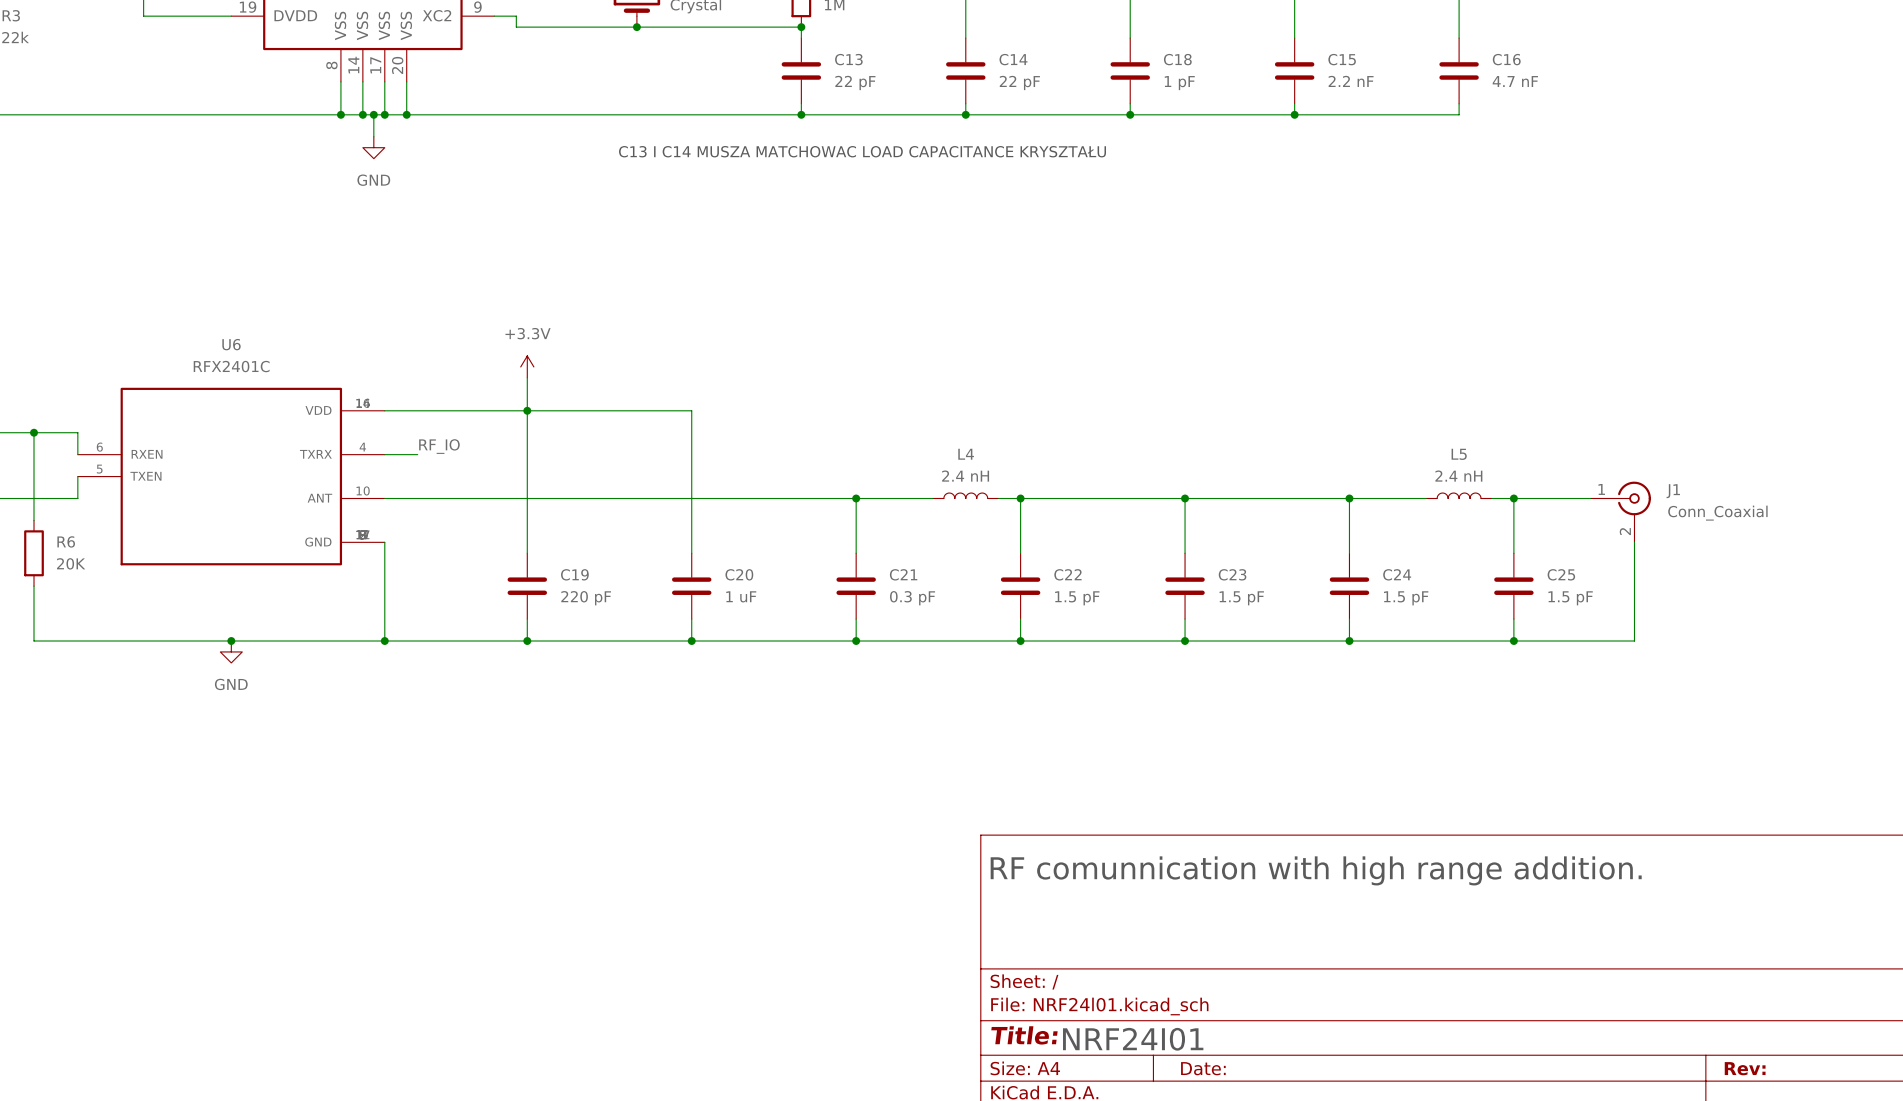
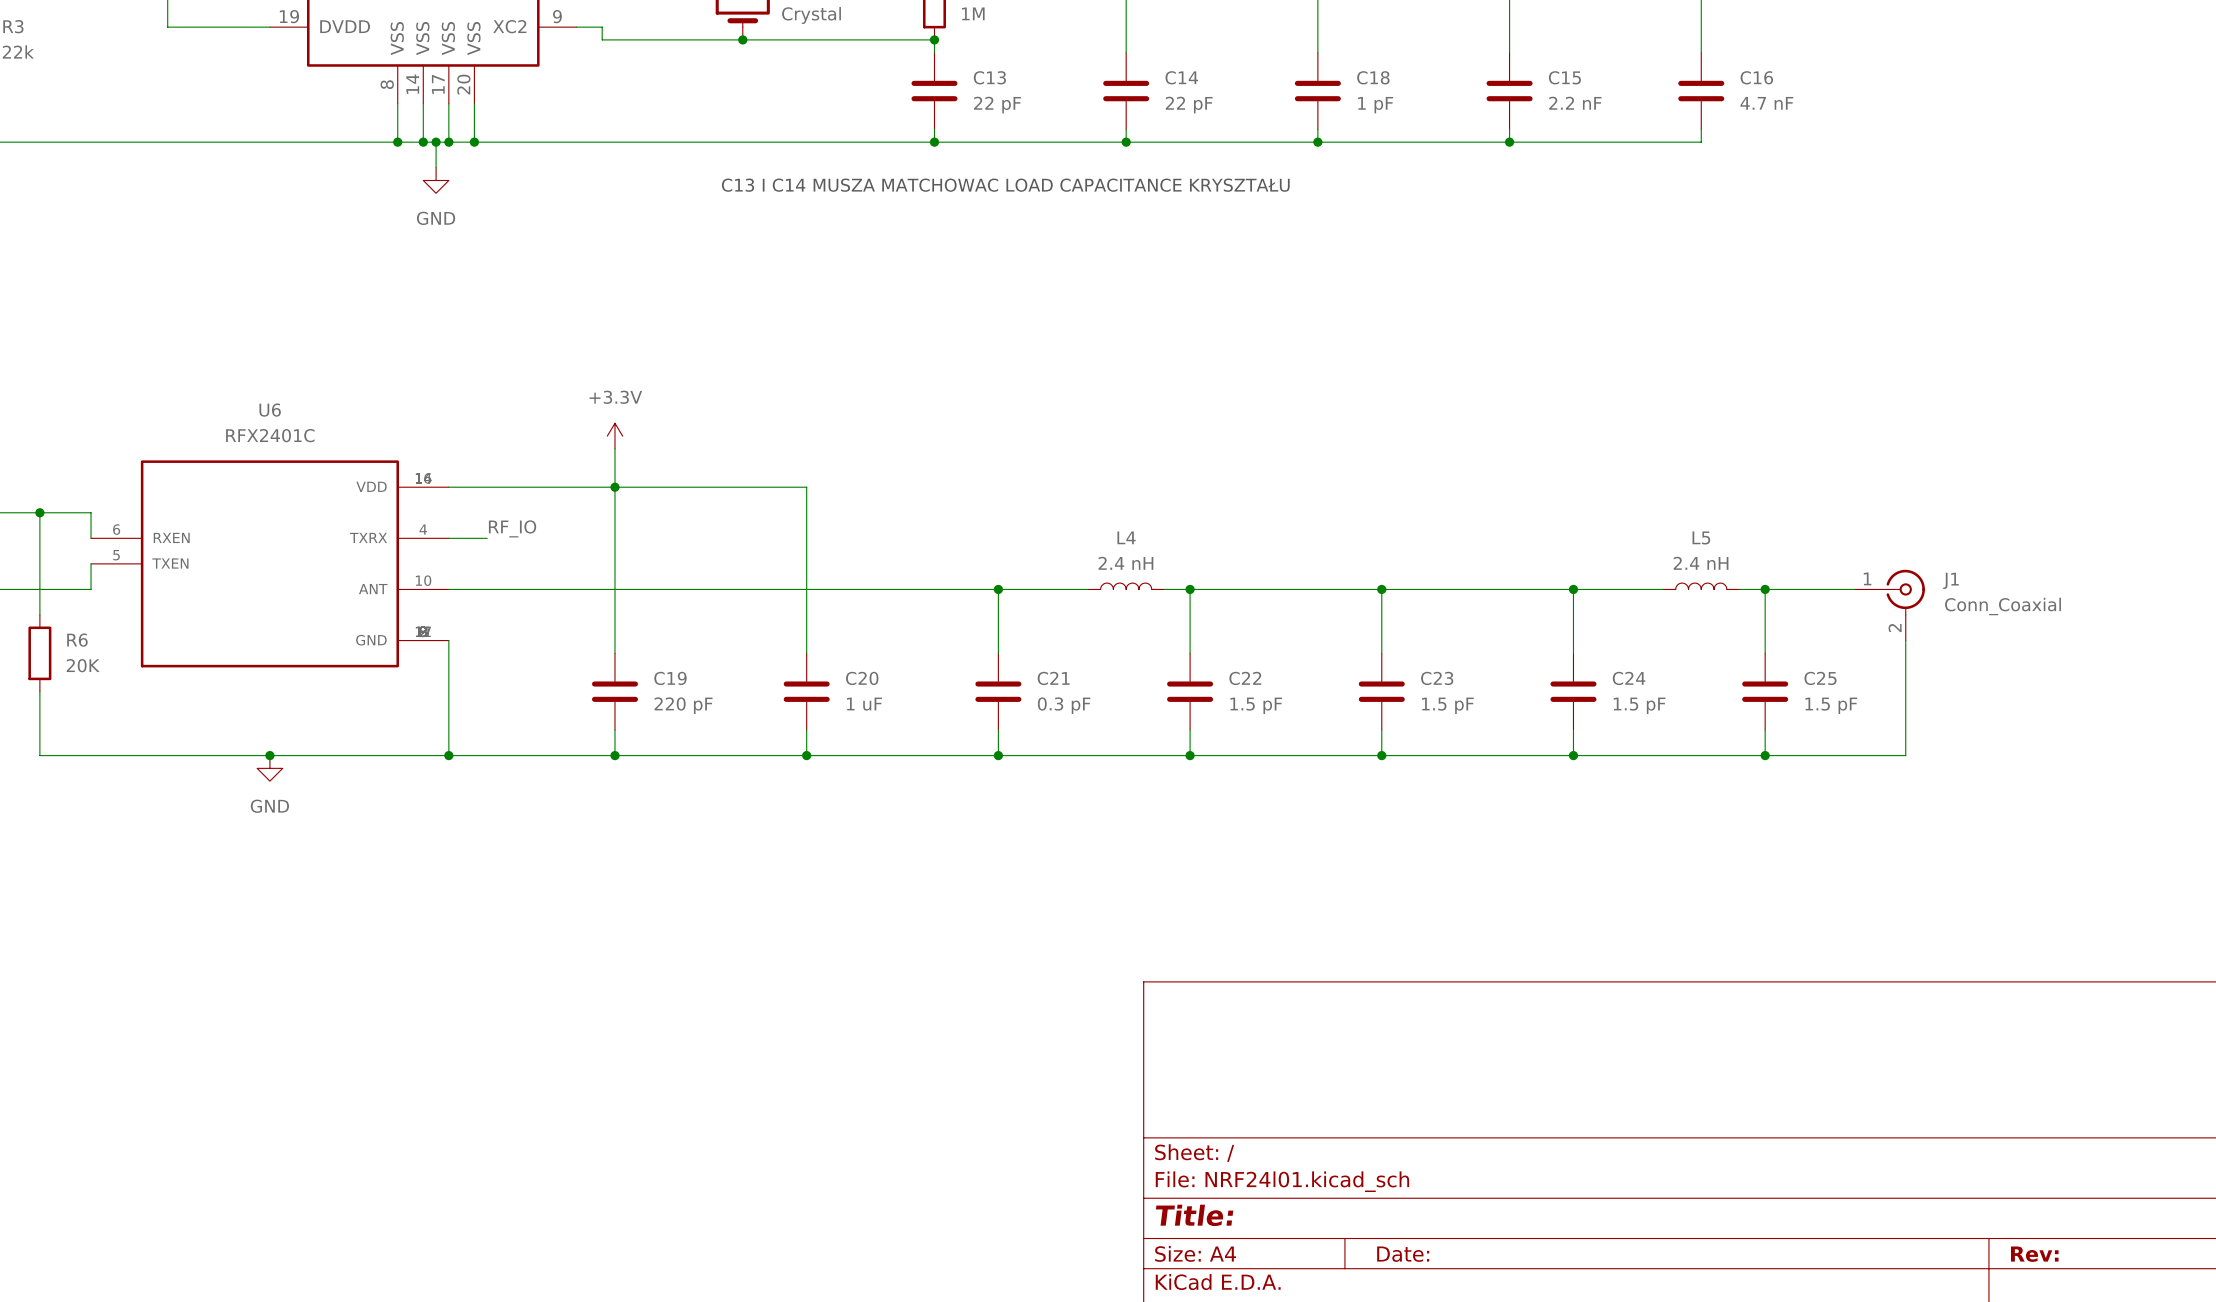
text: RF comunnication with high range addition. (1316, 870) -> none
text: NRF24I01 (1133, 1039) -> none

